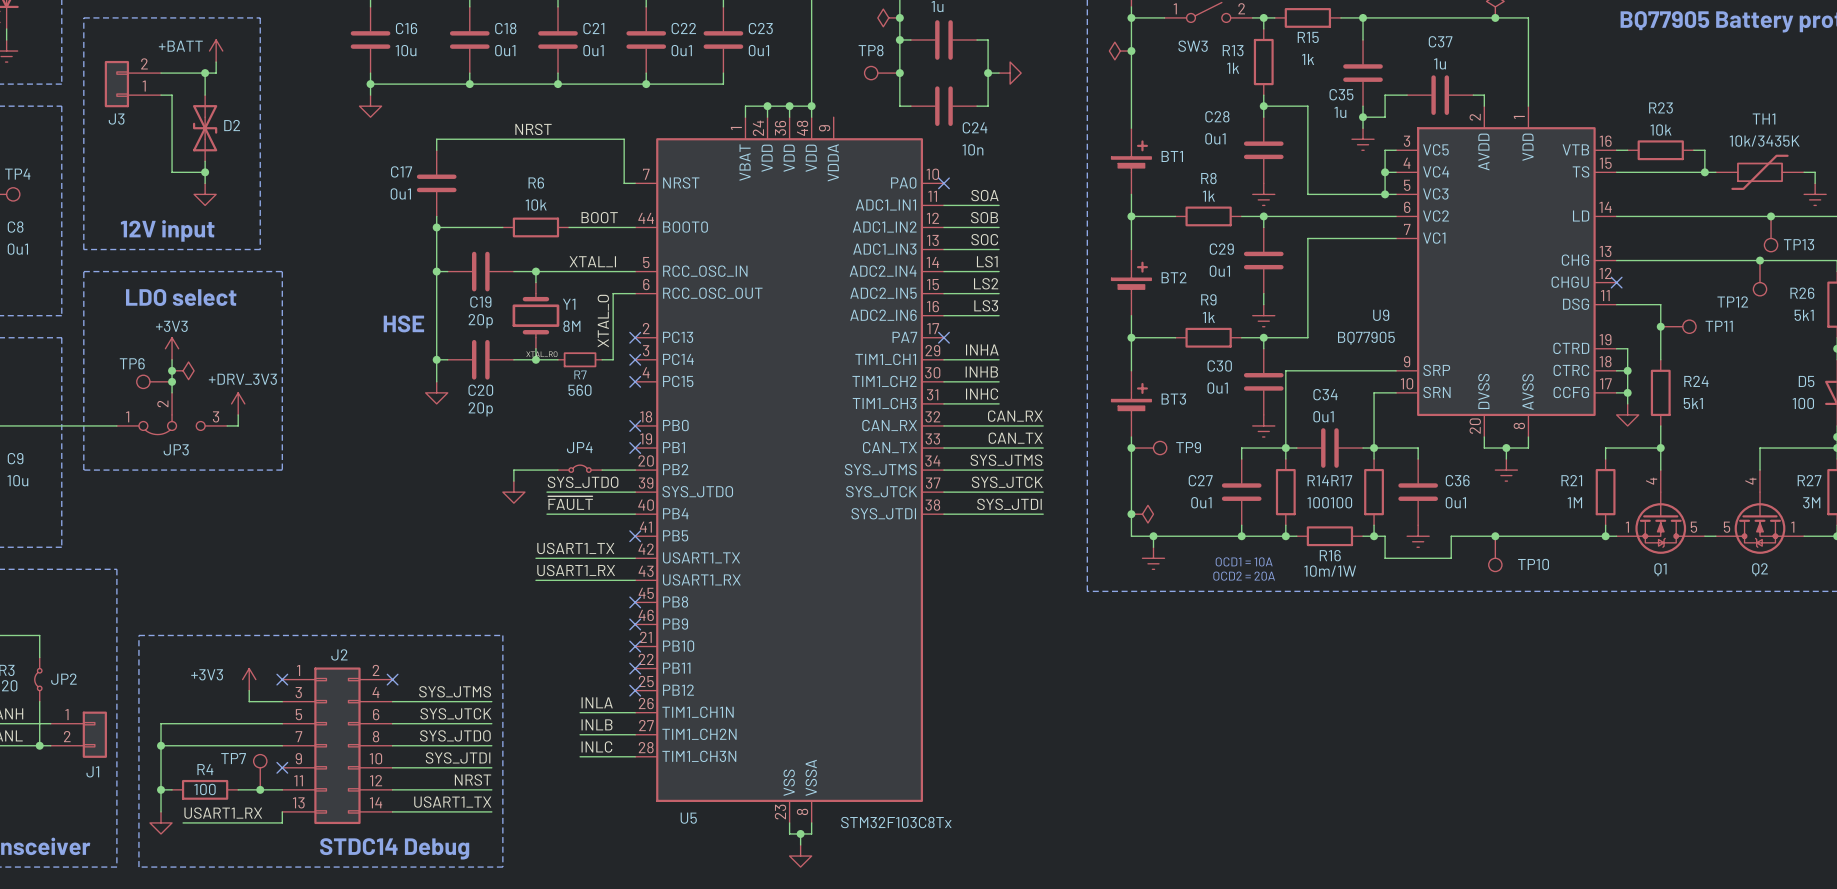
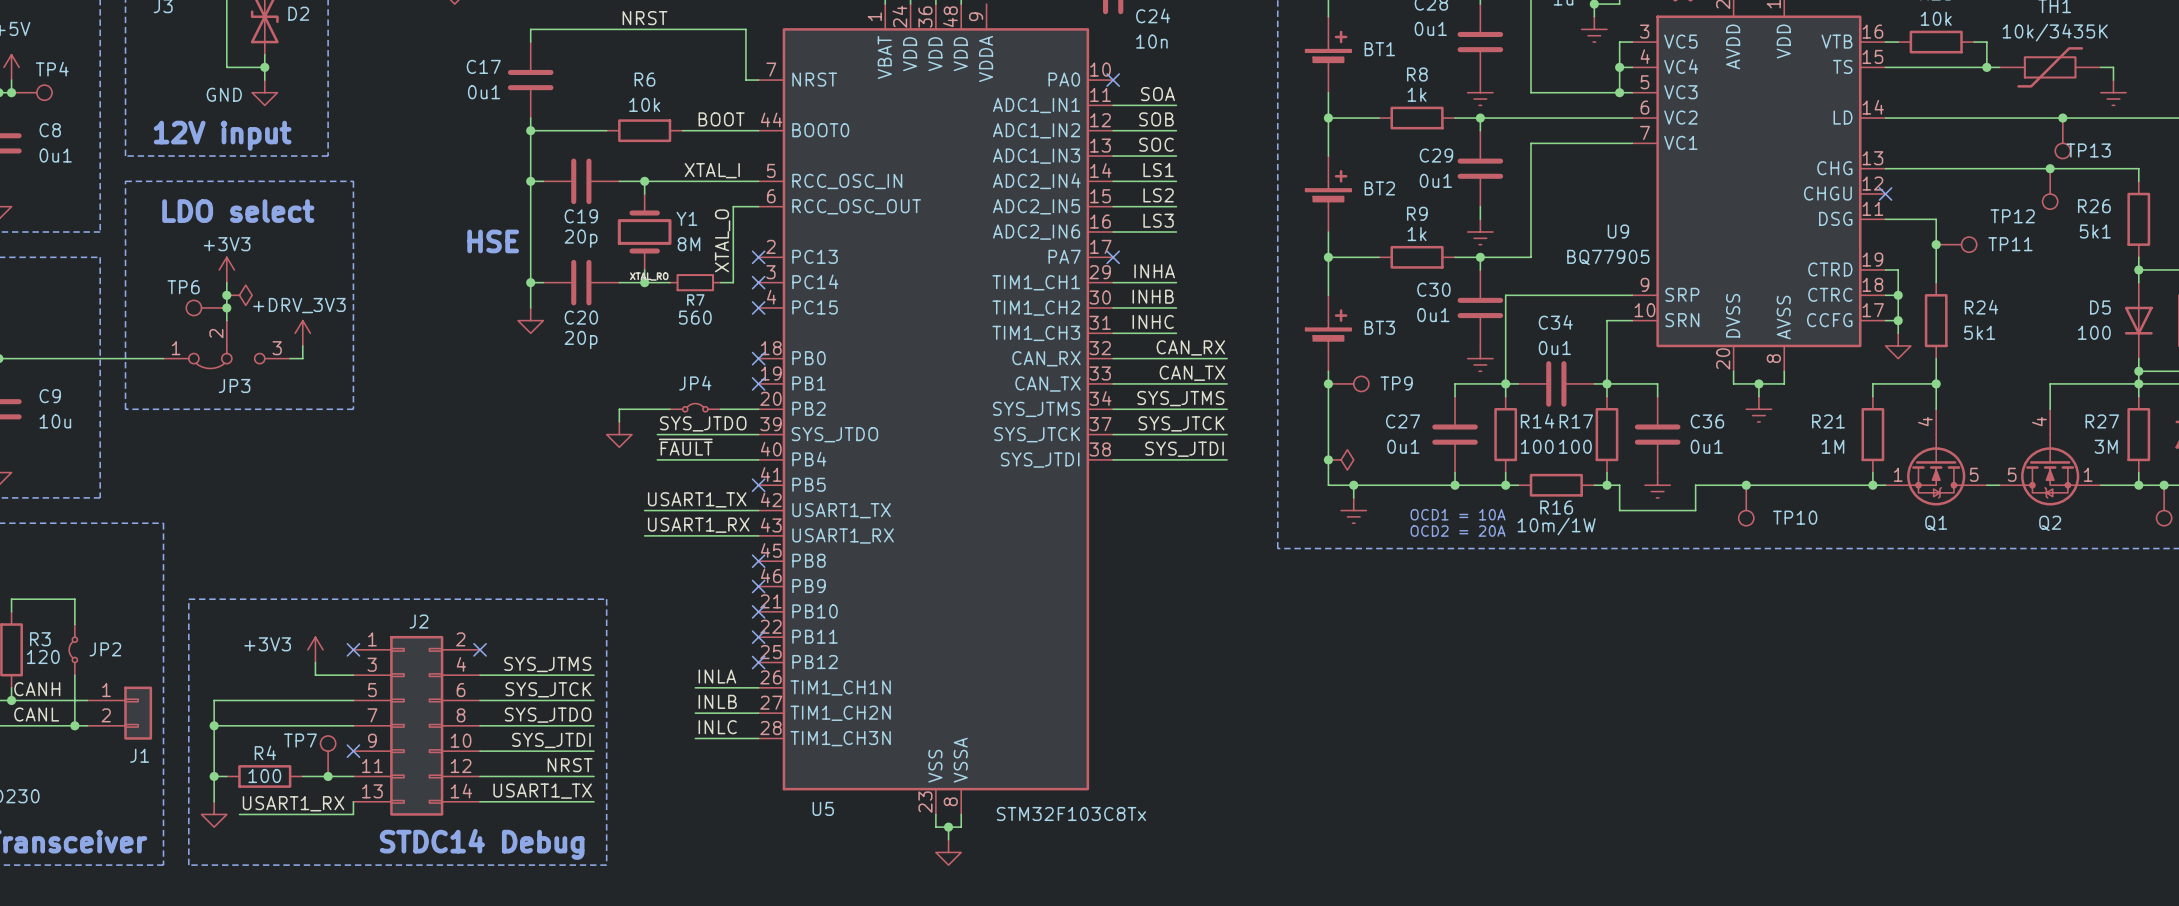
power symbol text: none -> GND (224, 94)

